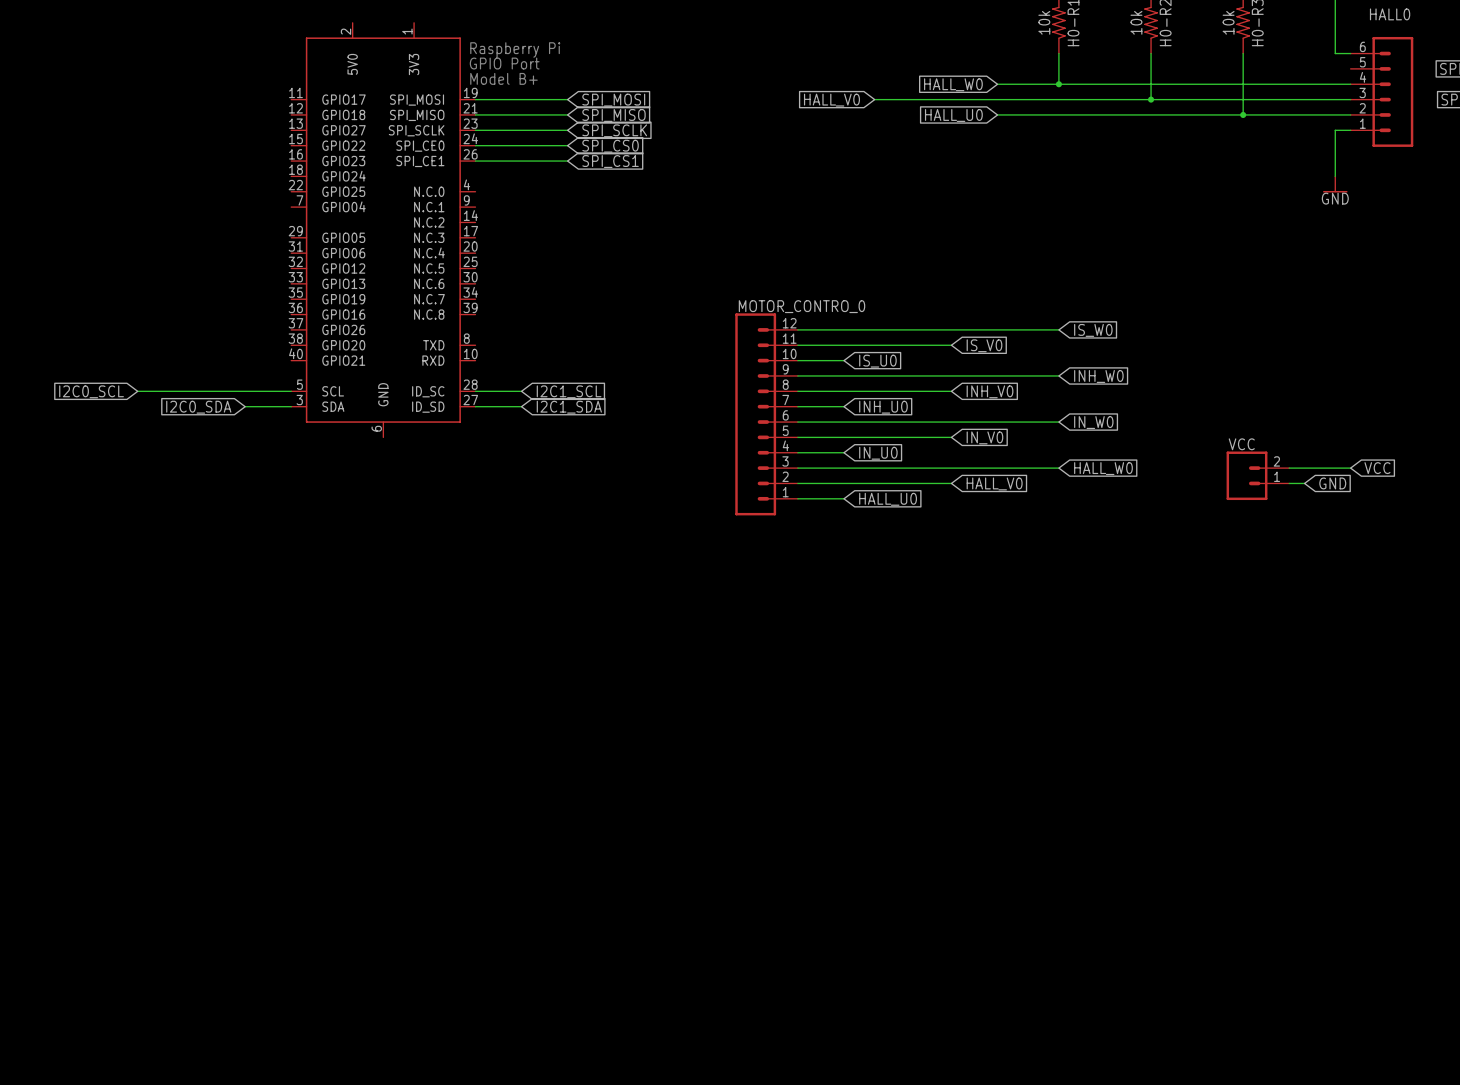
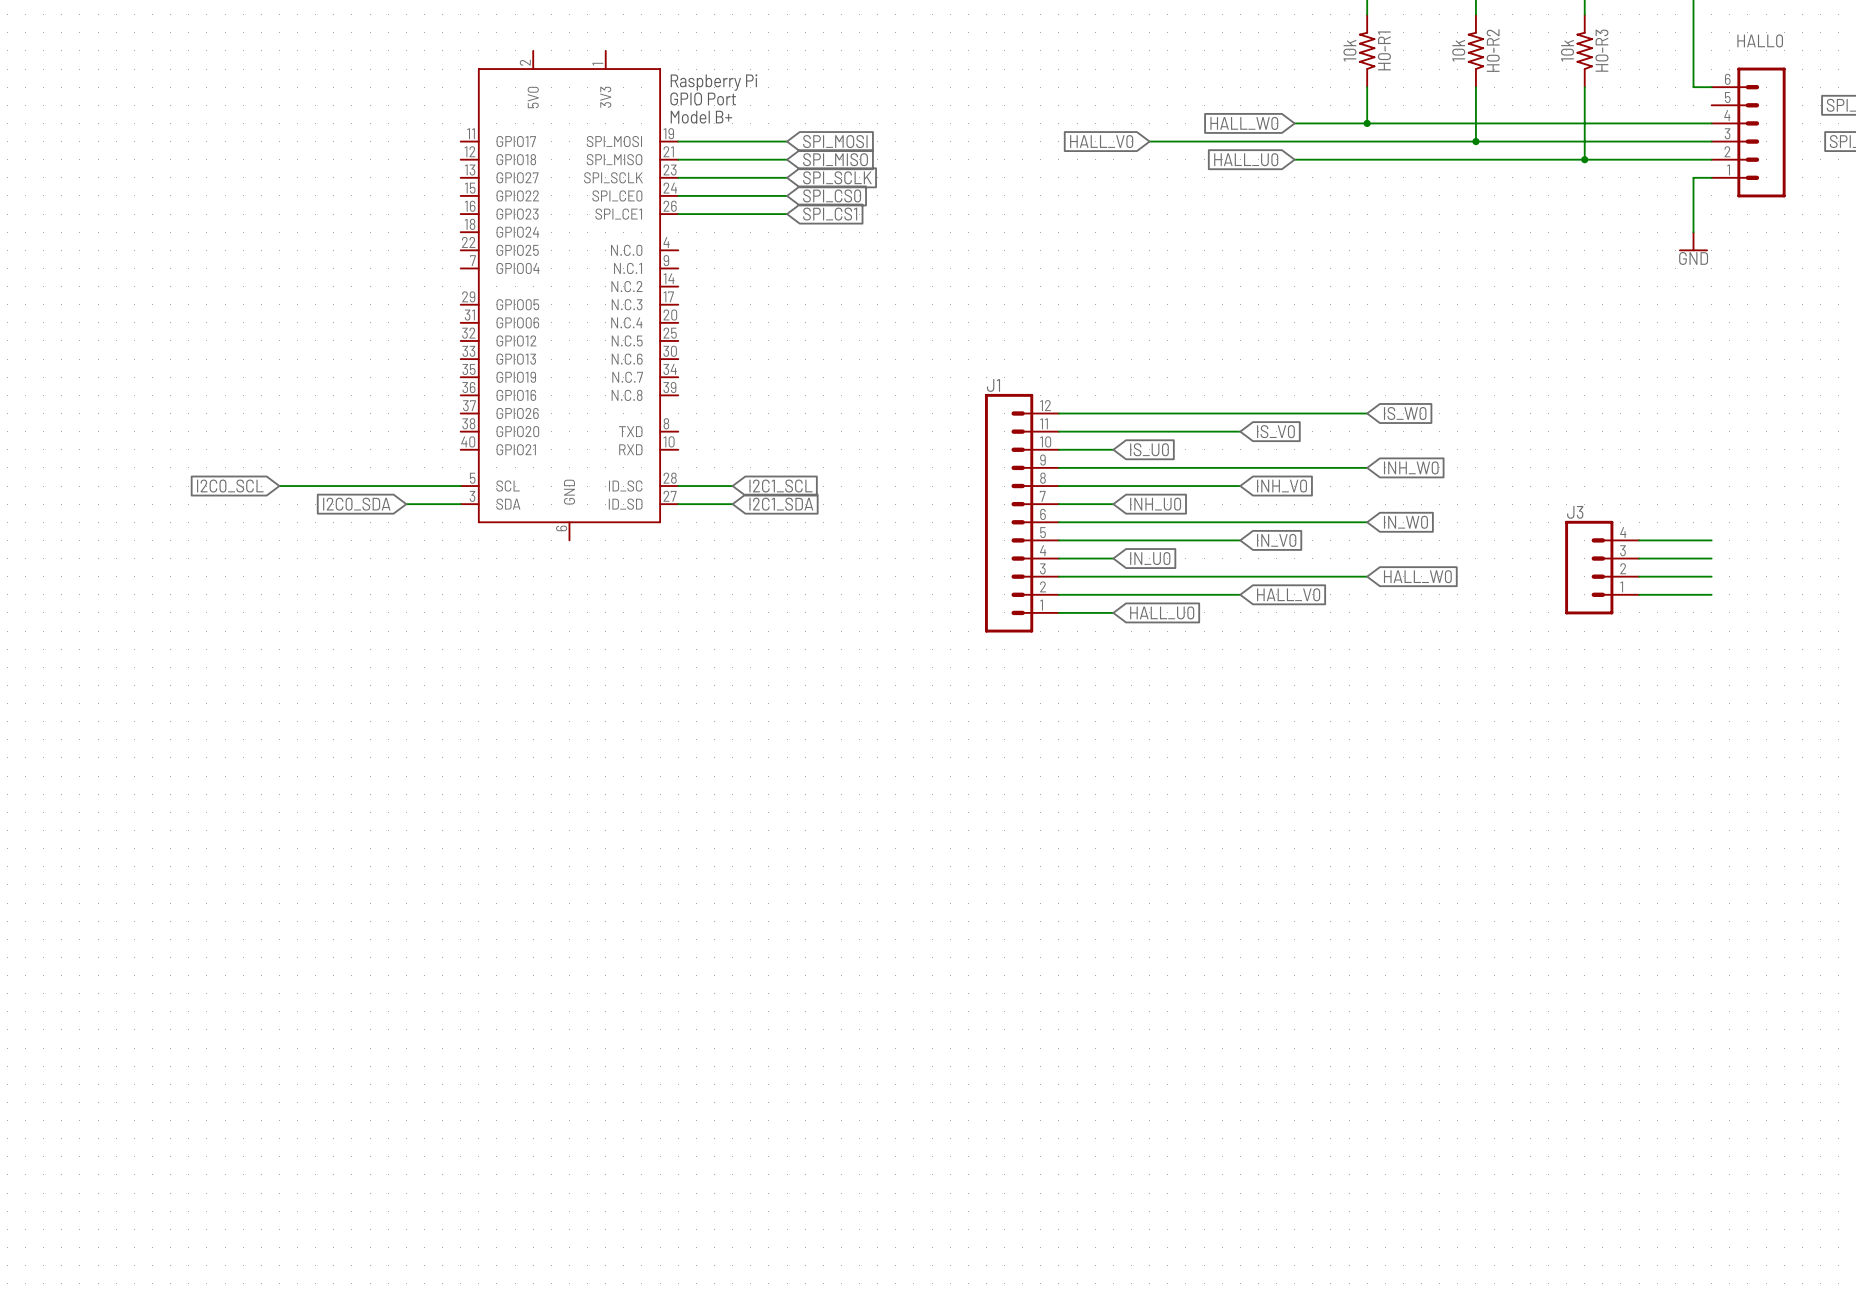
MOTOR_CONTRO_0 name: MOTOR_CONTRO_0 (802, 306) -> J1 (993, 385)
wire: none -> (1639, 540) (1711, 540)
wire: none -> (1639, 558) (1711, 558)
J3: none -> (1602, 567)
global label: VCC (1377, 468) -> none
VCC: (1257, 475) -> none
wire: none -> (1657, 594) (1711, 594)
global label: GND (1332, 483) -> none

